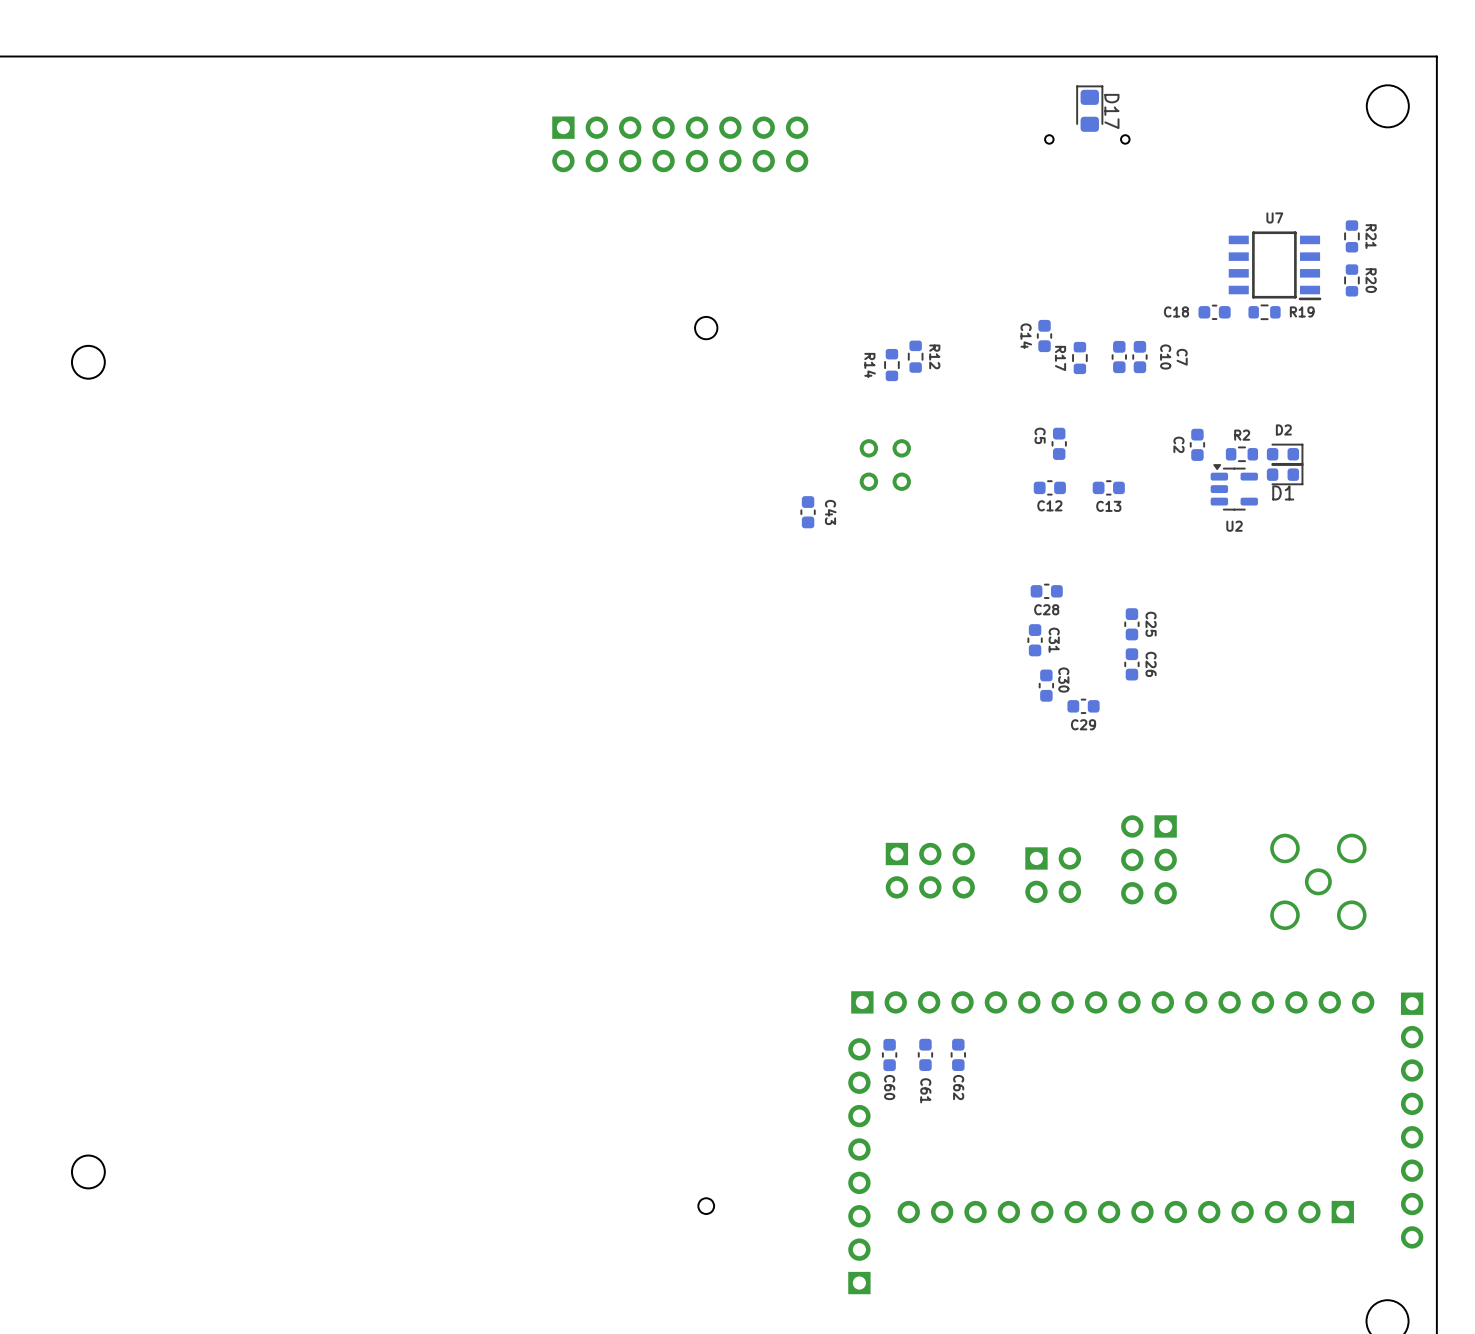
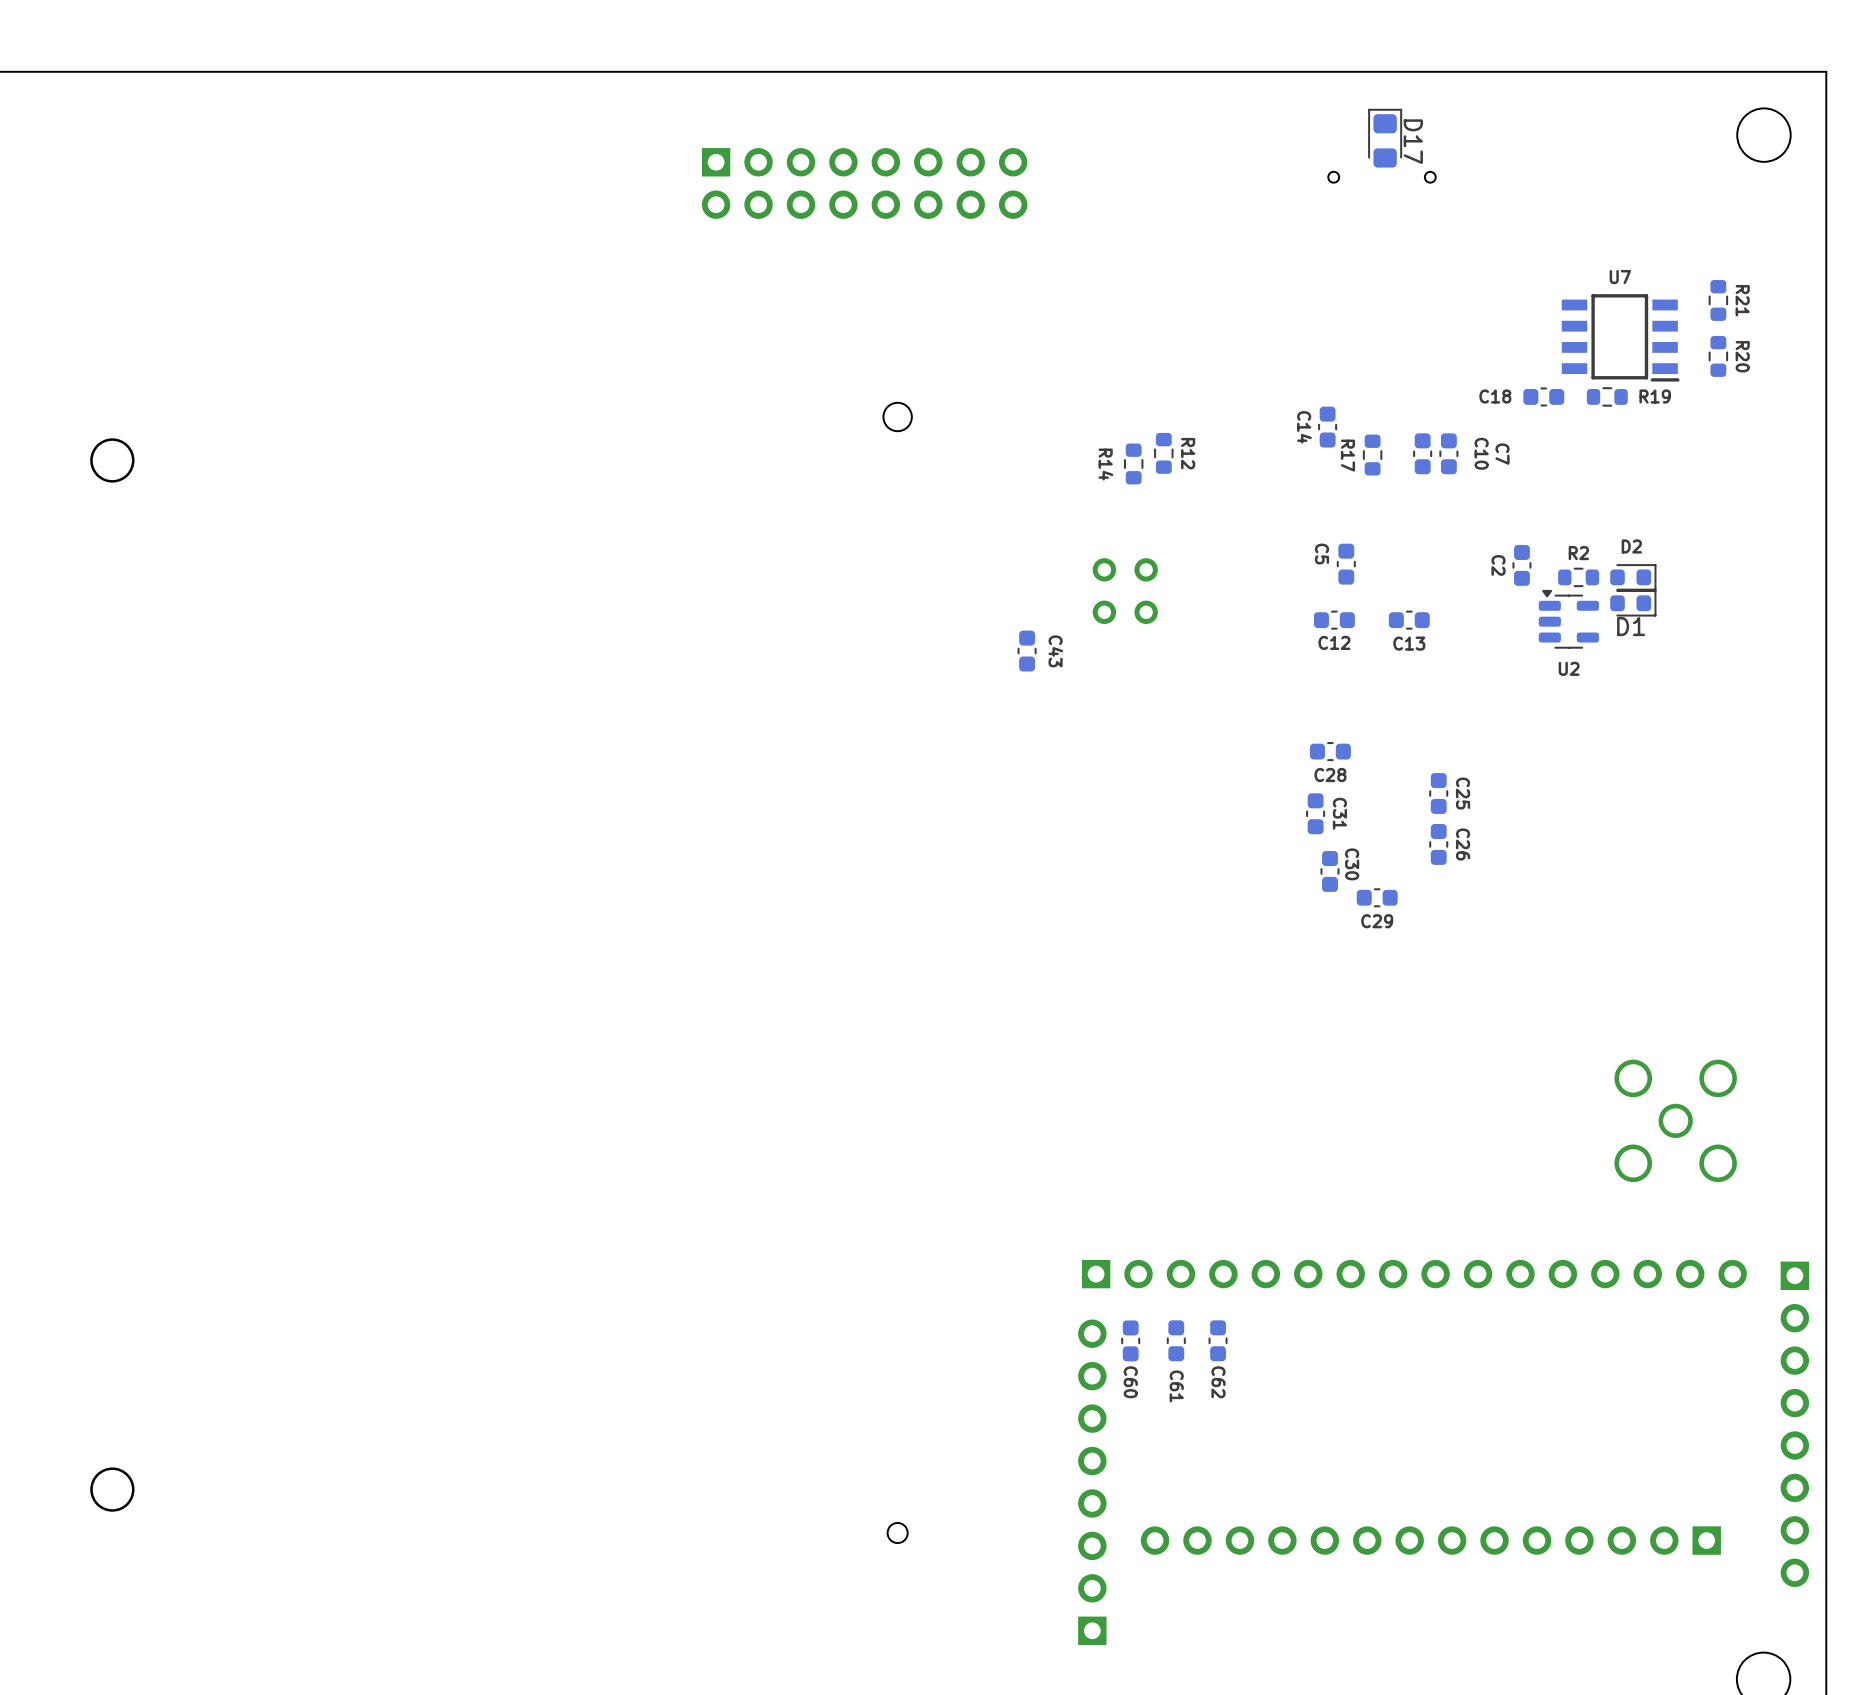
part: (1148, 859) -> none
part: (930, 870) -> none
part: (1053, 875) -> none

